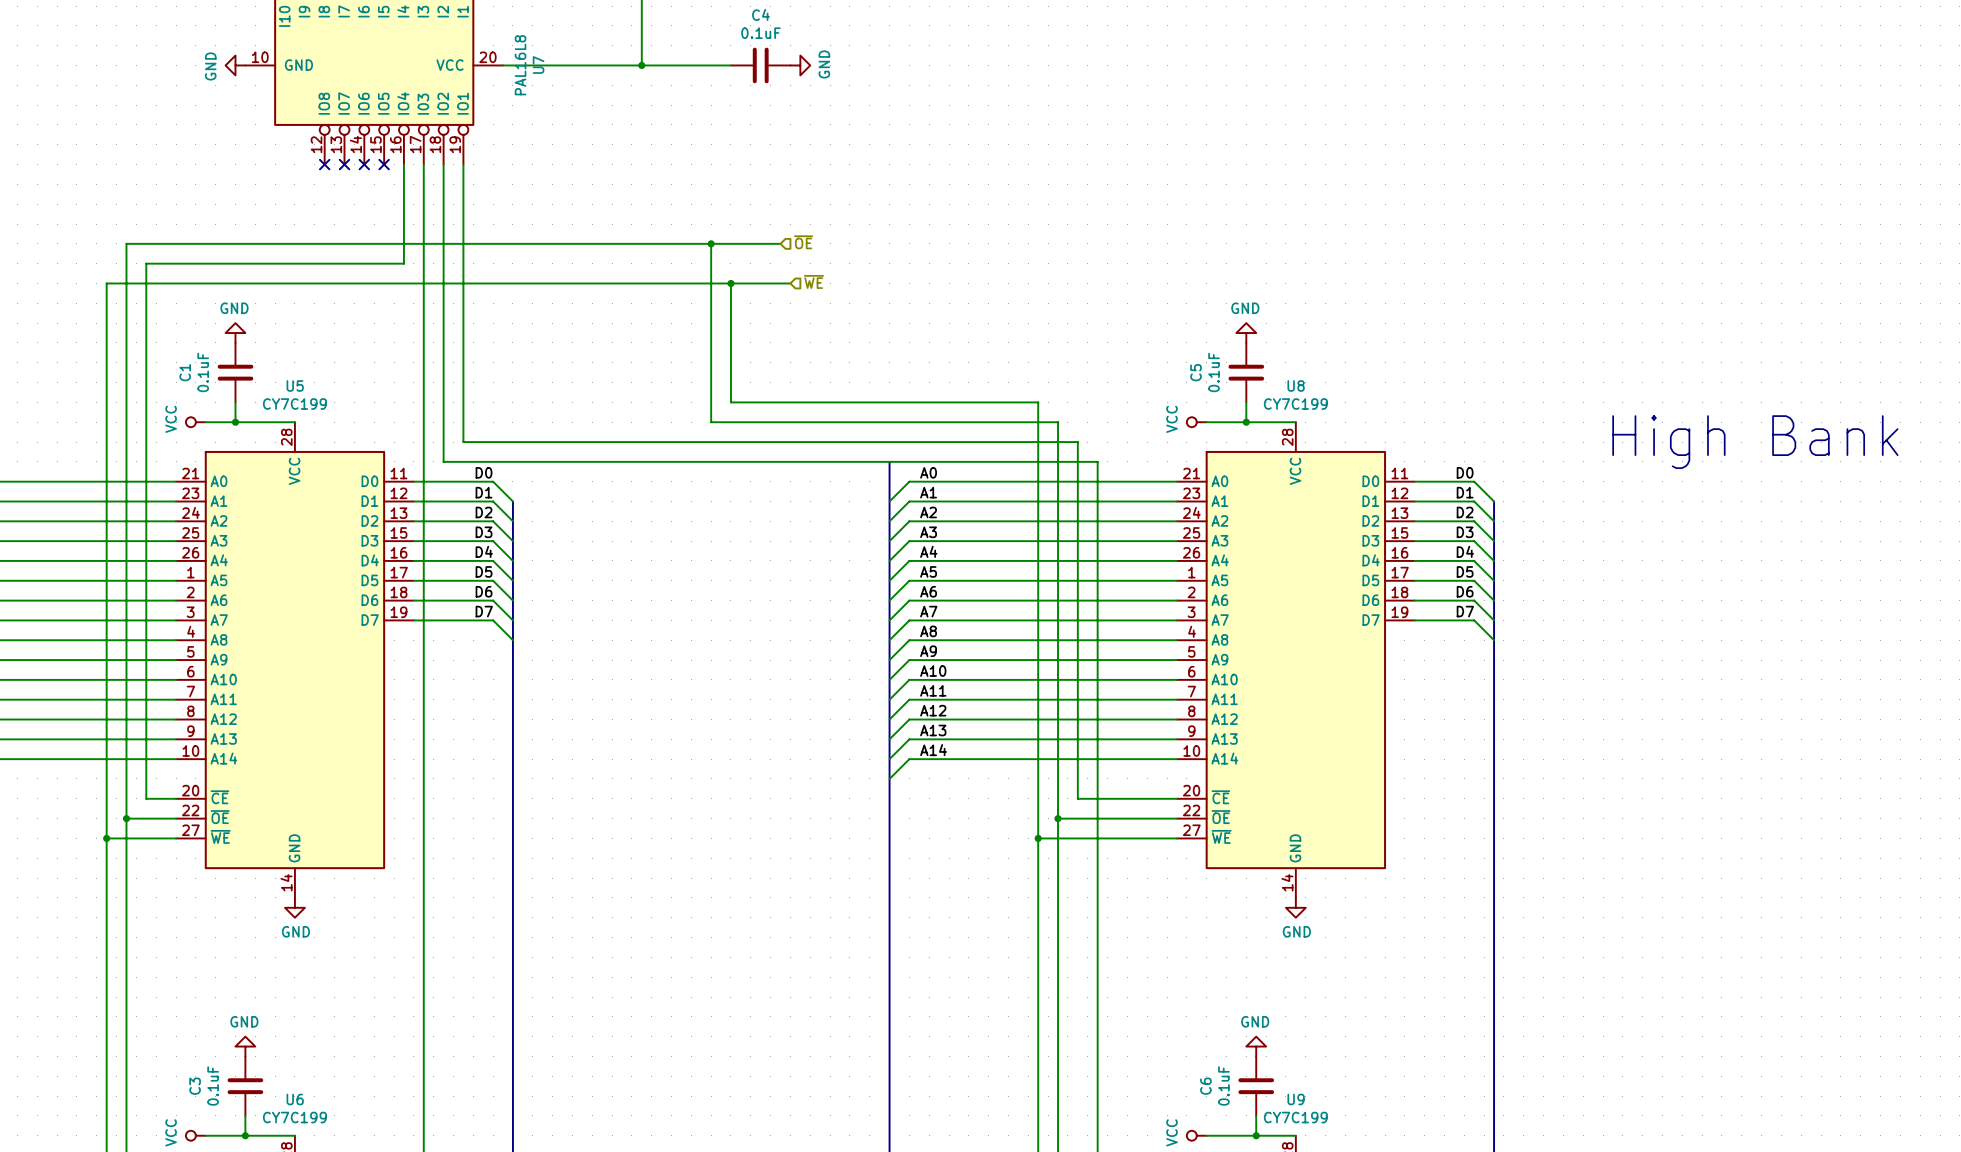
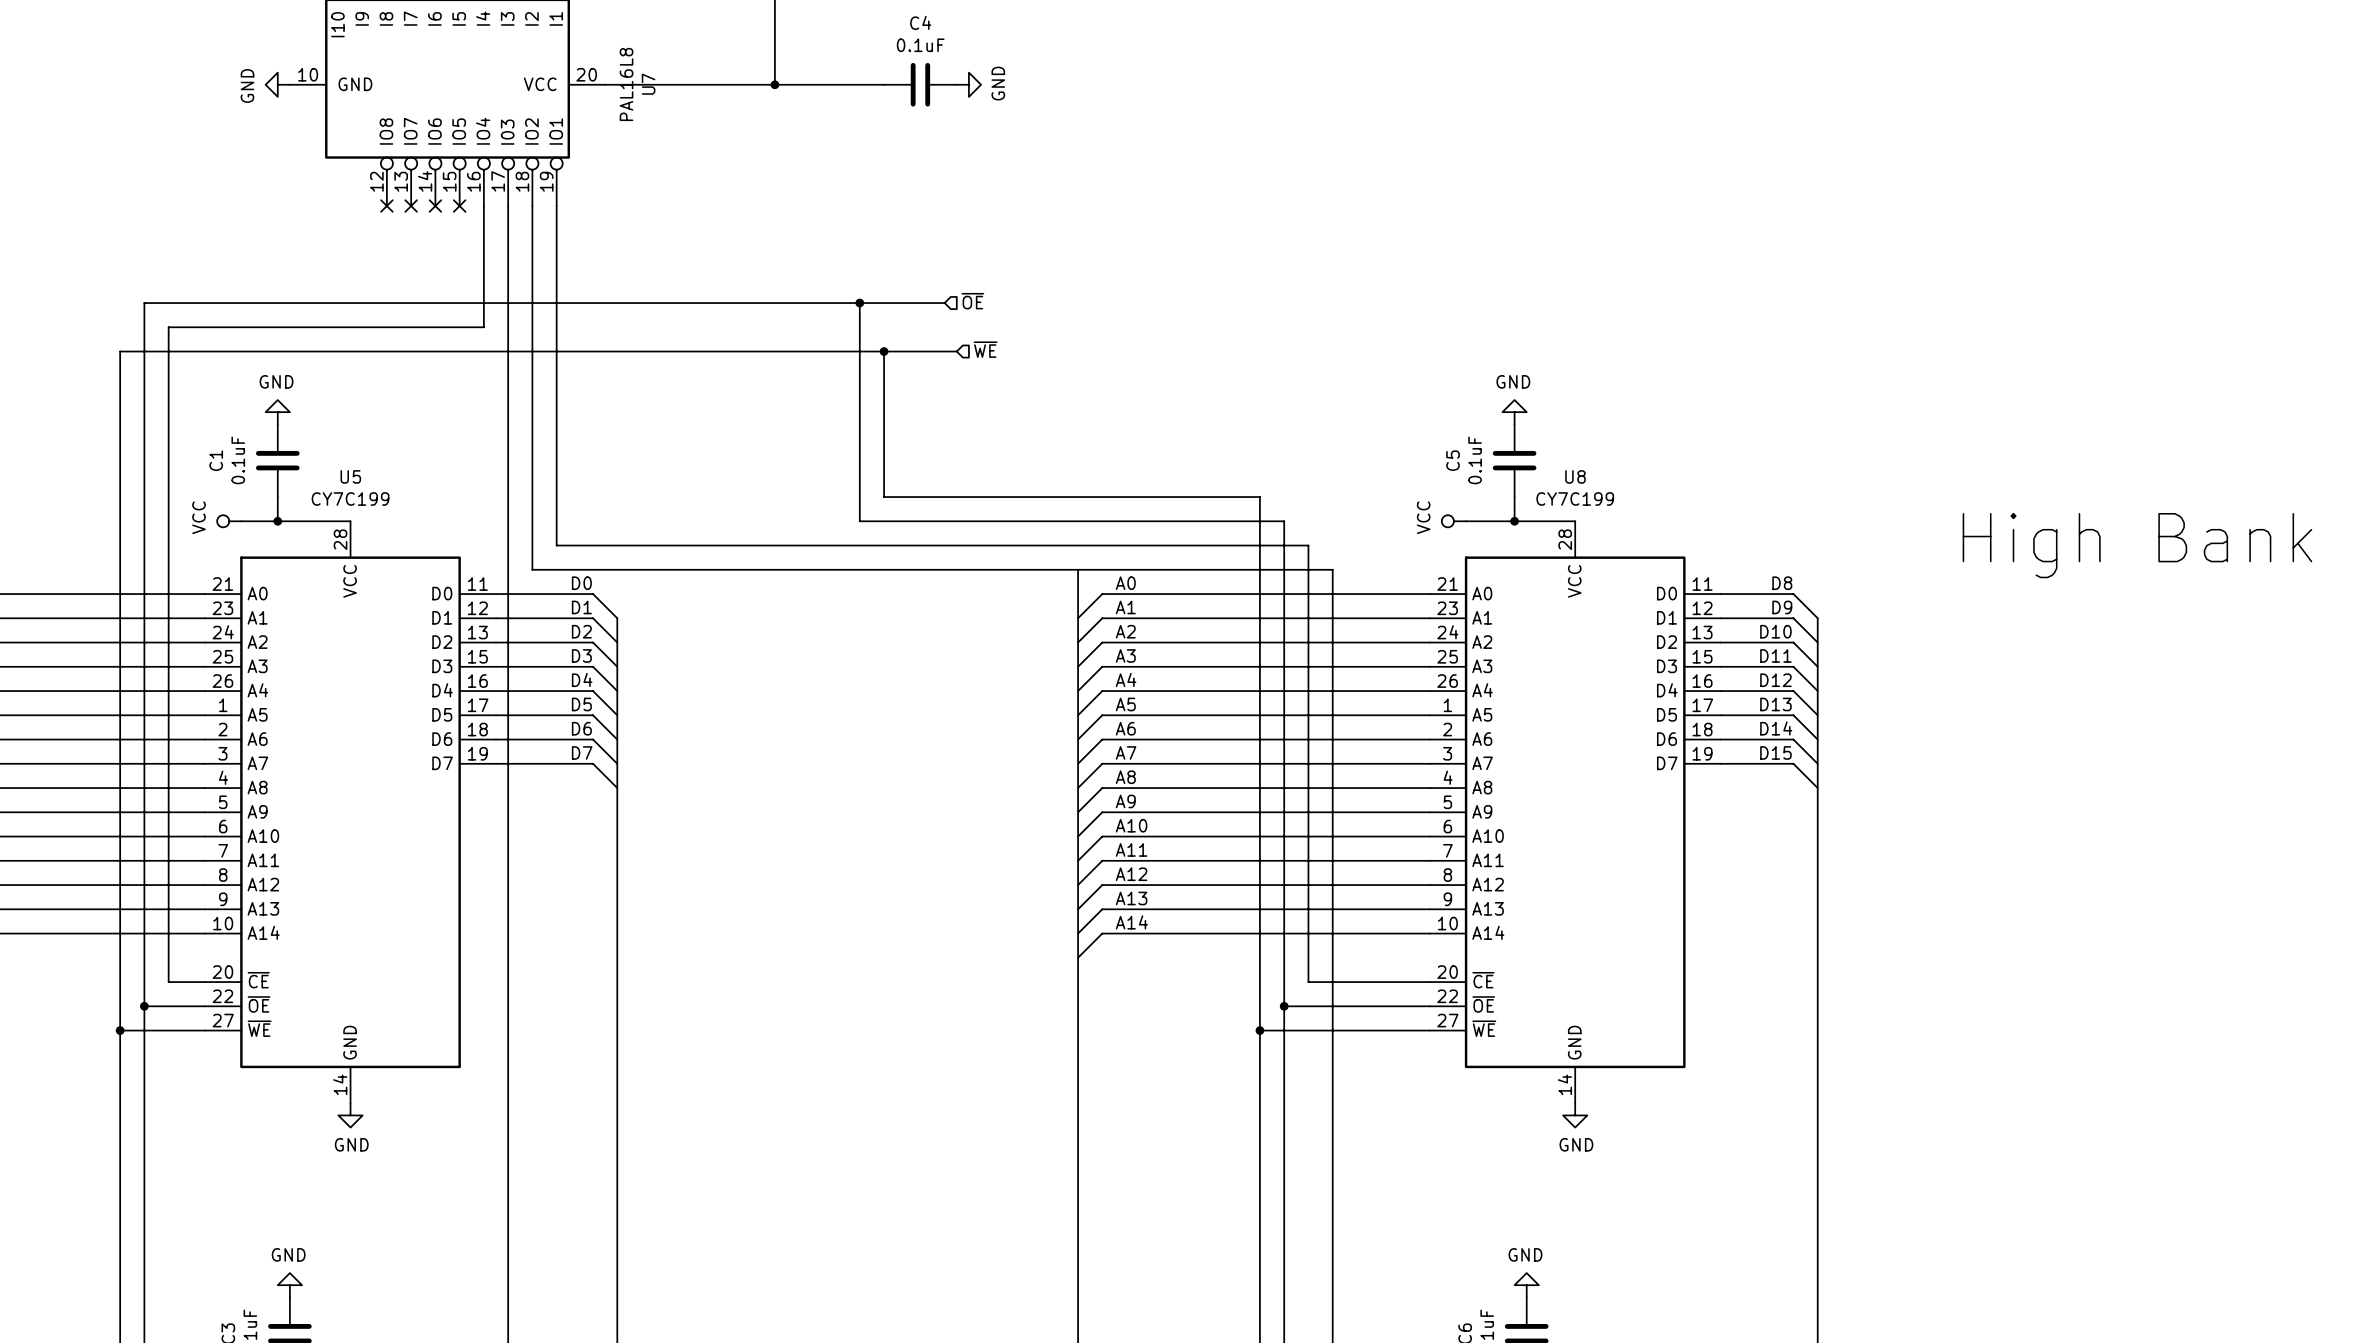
label: D0 (1465, 472) -> D8 (1782, 583)
label: D1 (1465, 492) -> D9 (1782, 607)
label: none -> D10 (1775, 631)
label: D2 (1465, 512) -> none
label: none -> D11 (1775, 655)
label: D3 (1465, 532) -> none
label: D4 (1465, 551) -> none
label: none -> D12 (1775, 680)
label: none -> D13 (1775, 704)
label: D5 (1465, 571) -> none
label: none -> D14 (1776, 728)
label: D6 (1465, 591) -> none
label: none -> D15 (1775, 752)
label: D7 (1465, 611) -> none

